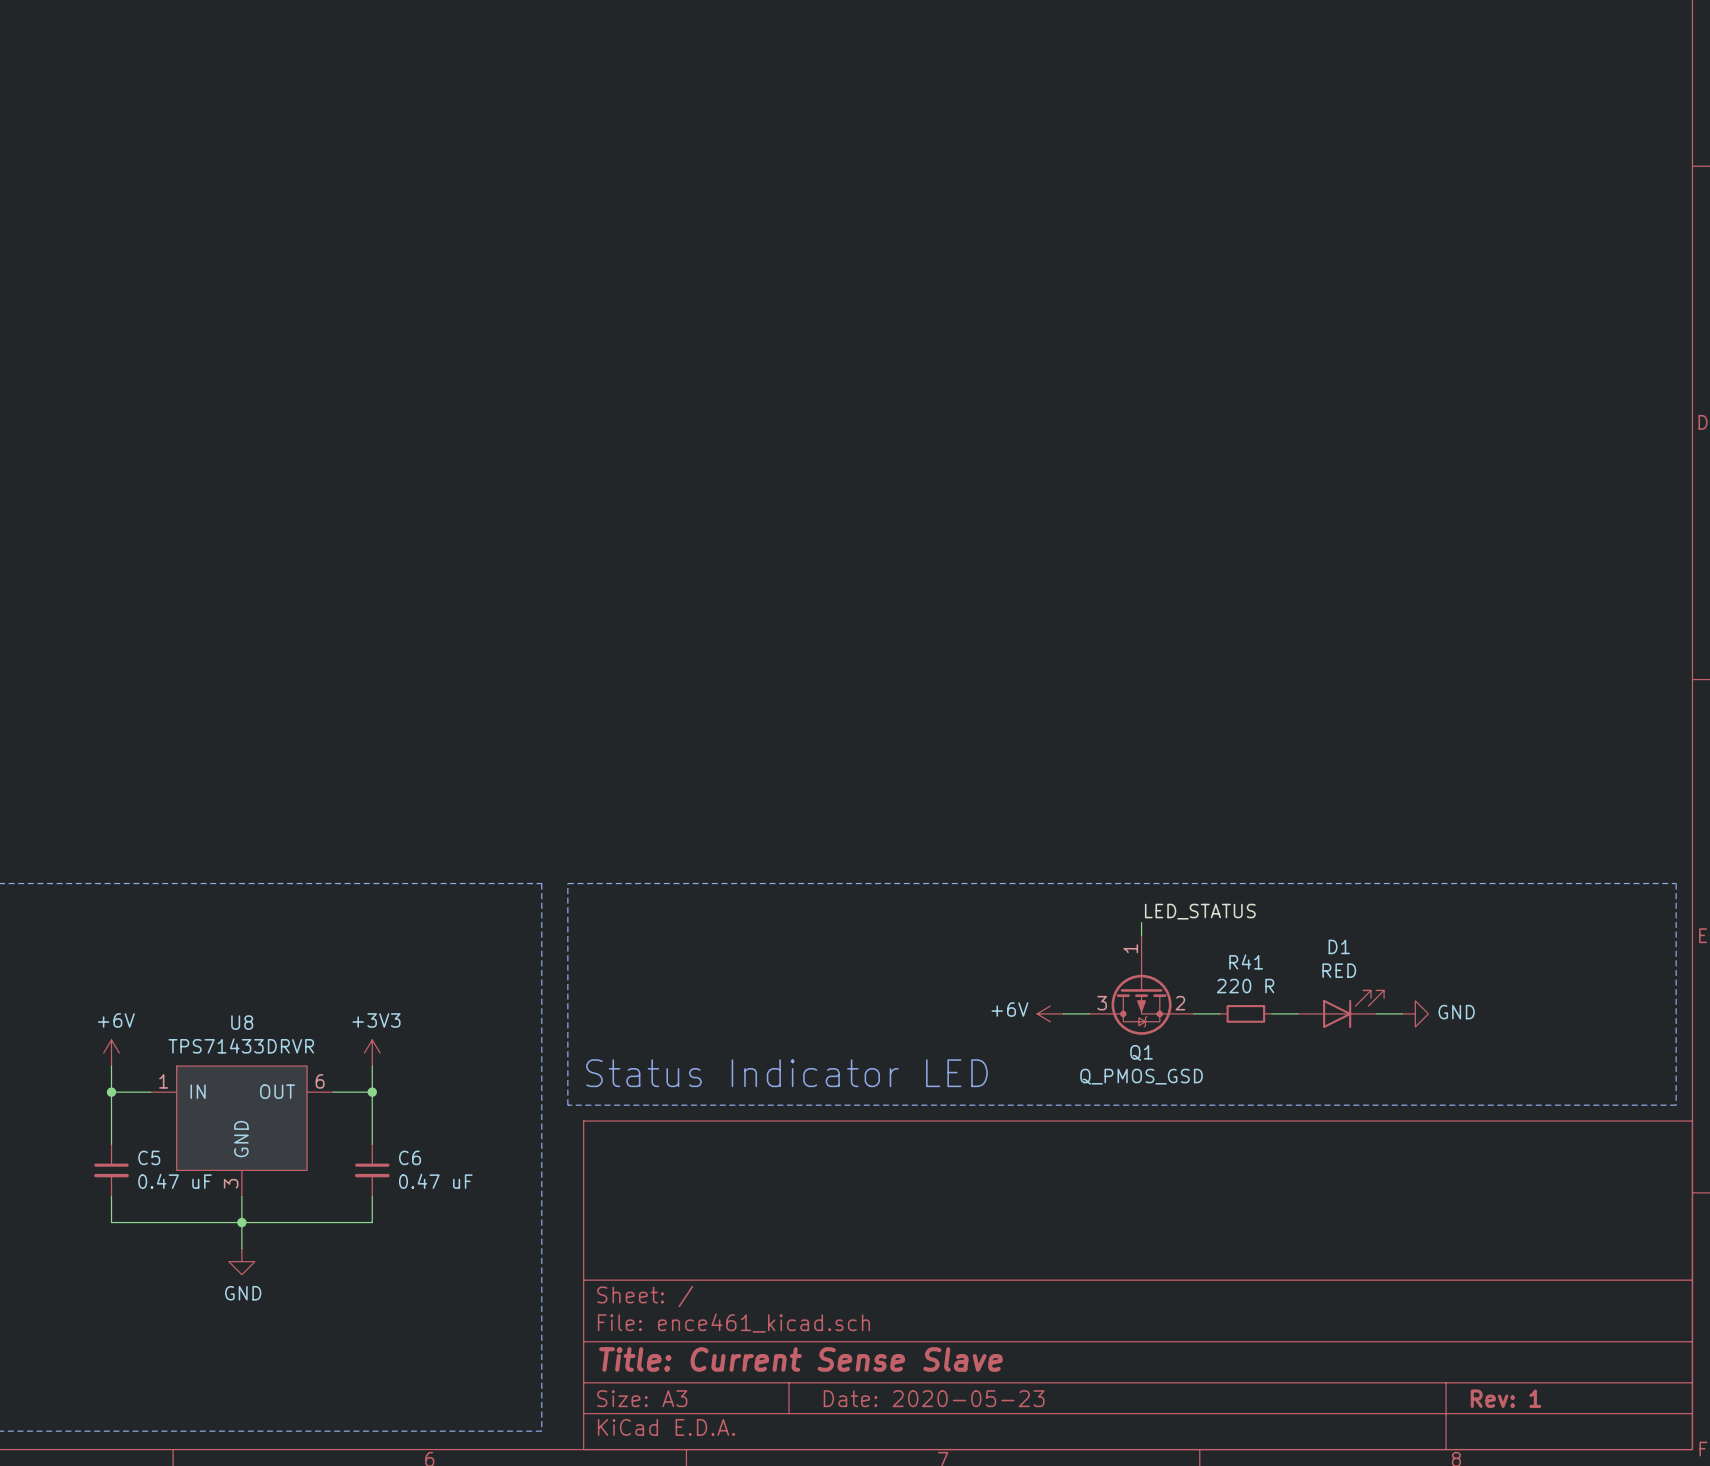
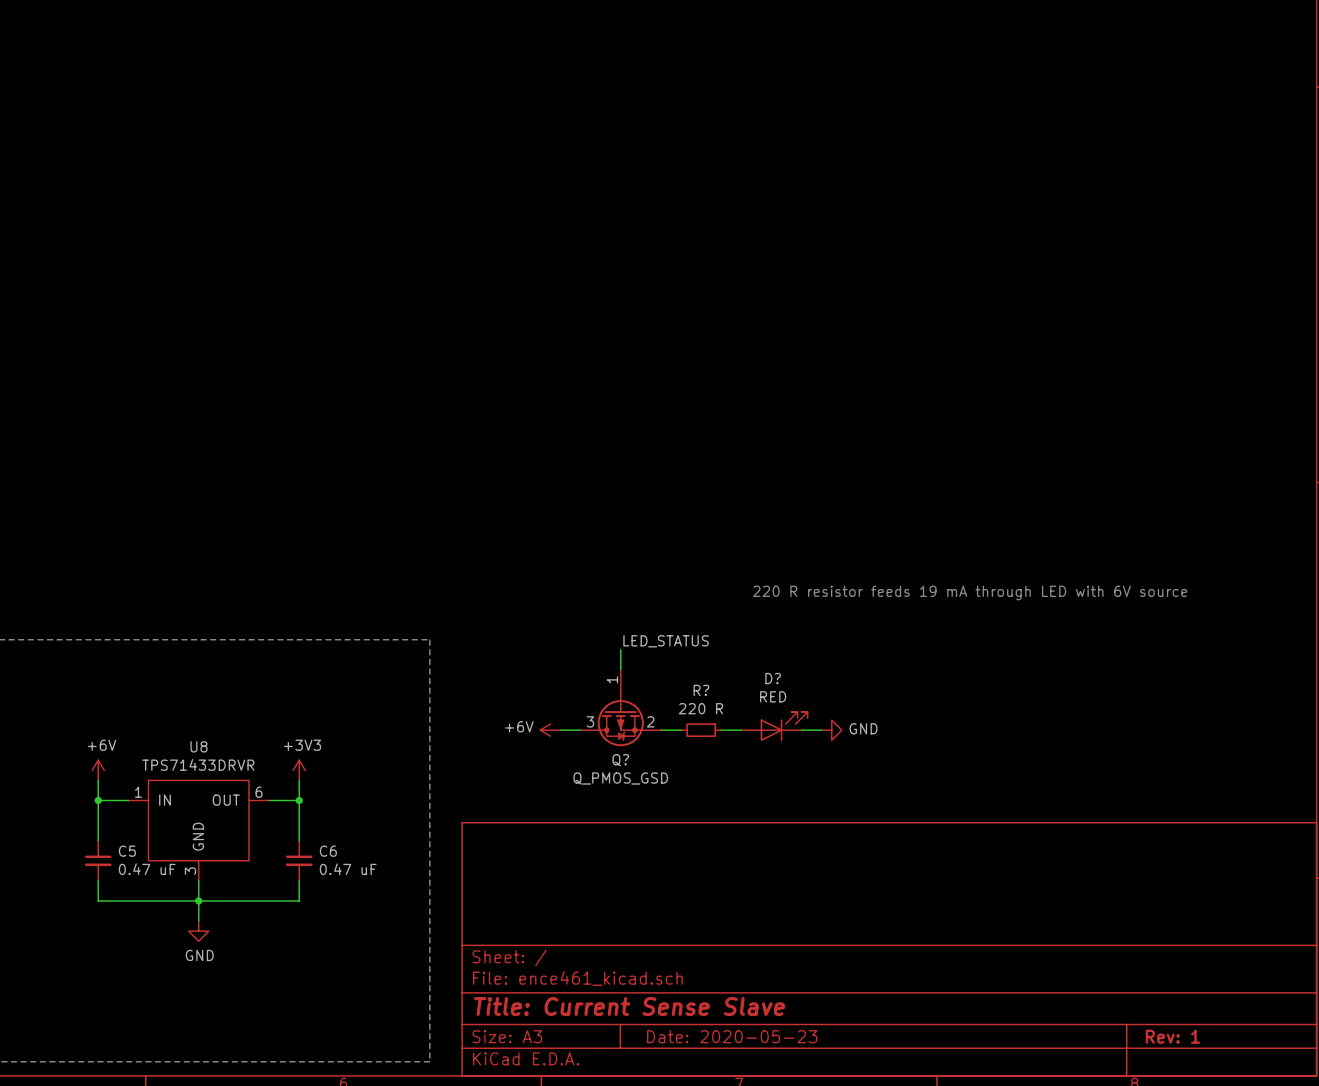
text: none -> 220 R resistor feeds 19 mA through LED with 6V source (970, 592)
line: (567, 883) (567, 1105) (1676, 1105) (1676, 883) (567, 883) -> none
label: none -> LED_STATUS (666, 641)
wire: none -> (620, 649) (620, 669)
label: LED_STATUS (1200, 911) -> none
wire: (1141, 922) (1141, 935) -> none
Q?: none -> Q_PMOS_GSD (620, 708)
Q1: Q_PMOS_GSD (1141, 985) -> none
D?: none -> RED (774, 726)
power symbol: none -> +6V (550, 730)
wire: none -> (560, 730) (580, 730)
wire: none -> (660, 730) (681, 730)
R?: none -> 220 R (701, 730)
wire: none -> (721, 730) (741, 730)
power symbol: none -> GND (831, 730)
D1: RED (1341, 1009) -> none
power symbol: +6V (1050, 1013) -> none
wire: (1063, 1013) (1089, 1013) -> (801, 730) (821, 730)
wire: (1193, 1013) (1219, 1013) -> none
R41: 220 R (1245, 1013) -> none
wire: (1271, 1013) (1298, 1013) -> none
wire: (1376, 1013) (1402, 1013) -> none
power symbol: GND (1415, 1013) -> none
text: Status Indicator LED (786, 1073) -> none

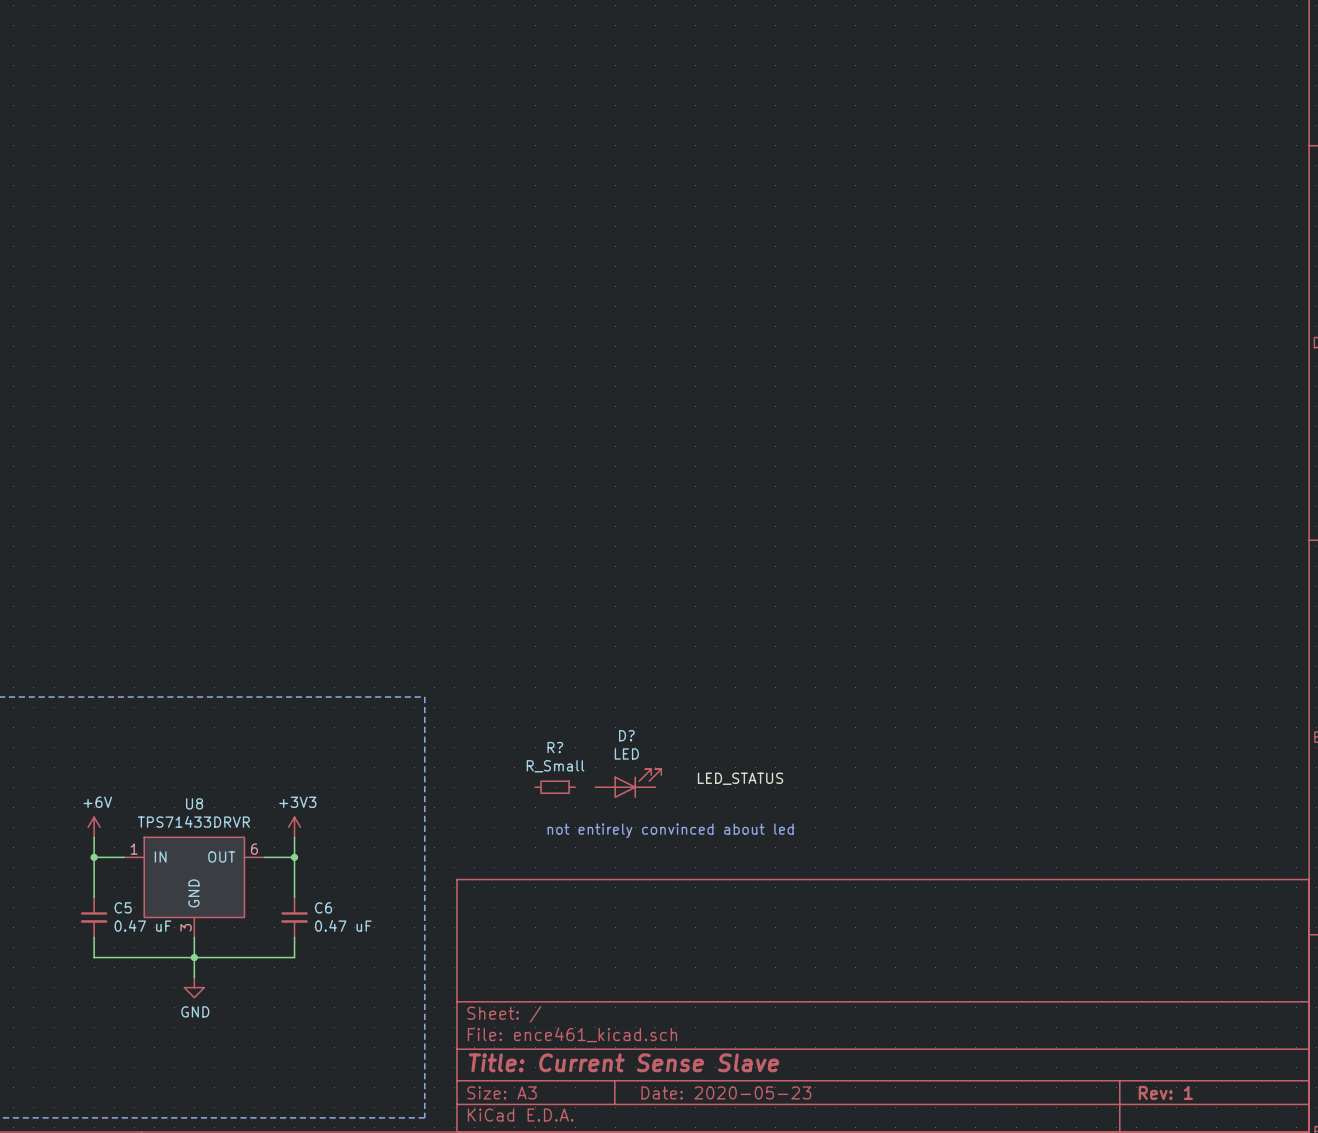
text: 220 R resistor feeds 19 mA through LED with 6V source (970, 592) -> none
label position: LED_STATUS (666, 641) -> LED_STATUS (740, 778)
wire: (620, 649) (620, 669) -> none
Q?: Q_PMOS_GSD (620, 708) -> none
D?: none -> LED (628, 783)
D?: RED (774, 726) -> none
power symbol: +6V (550, 730) -> none
wire: (560, 730) (580, 730) -> none
R?: none -> R_Small (555, 787)
wire: (660, 730) (681, 730) -> none
R?: 220 R (701, 730) -> none
wire: (721, 730) (741, 730) -> none
wire: (801, 730) (821, 730) -> none
power symbol: GND (831, 730) -> none
text: none -> not entirely convinced about led (670, 830)

